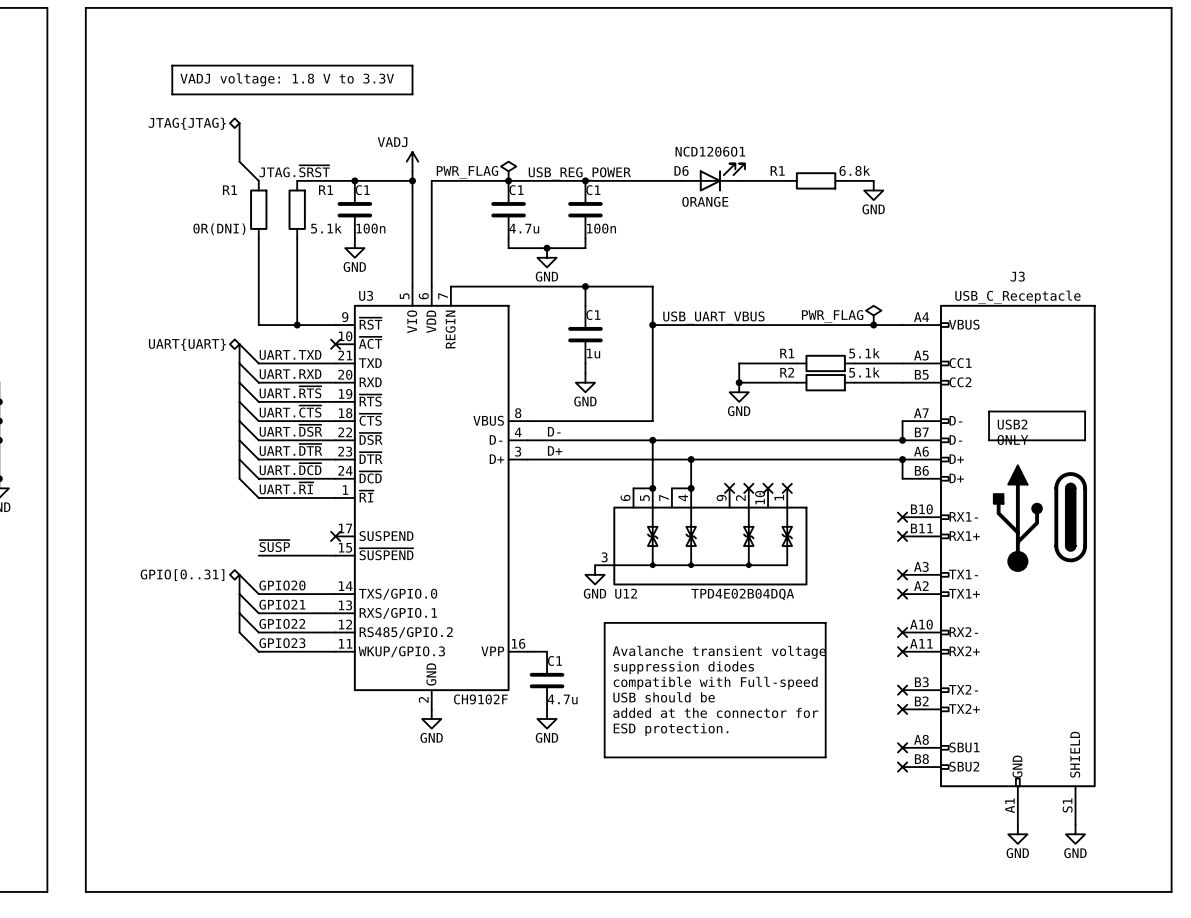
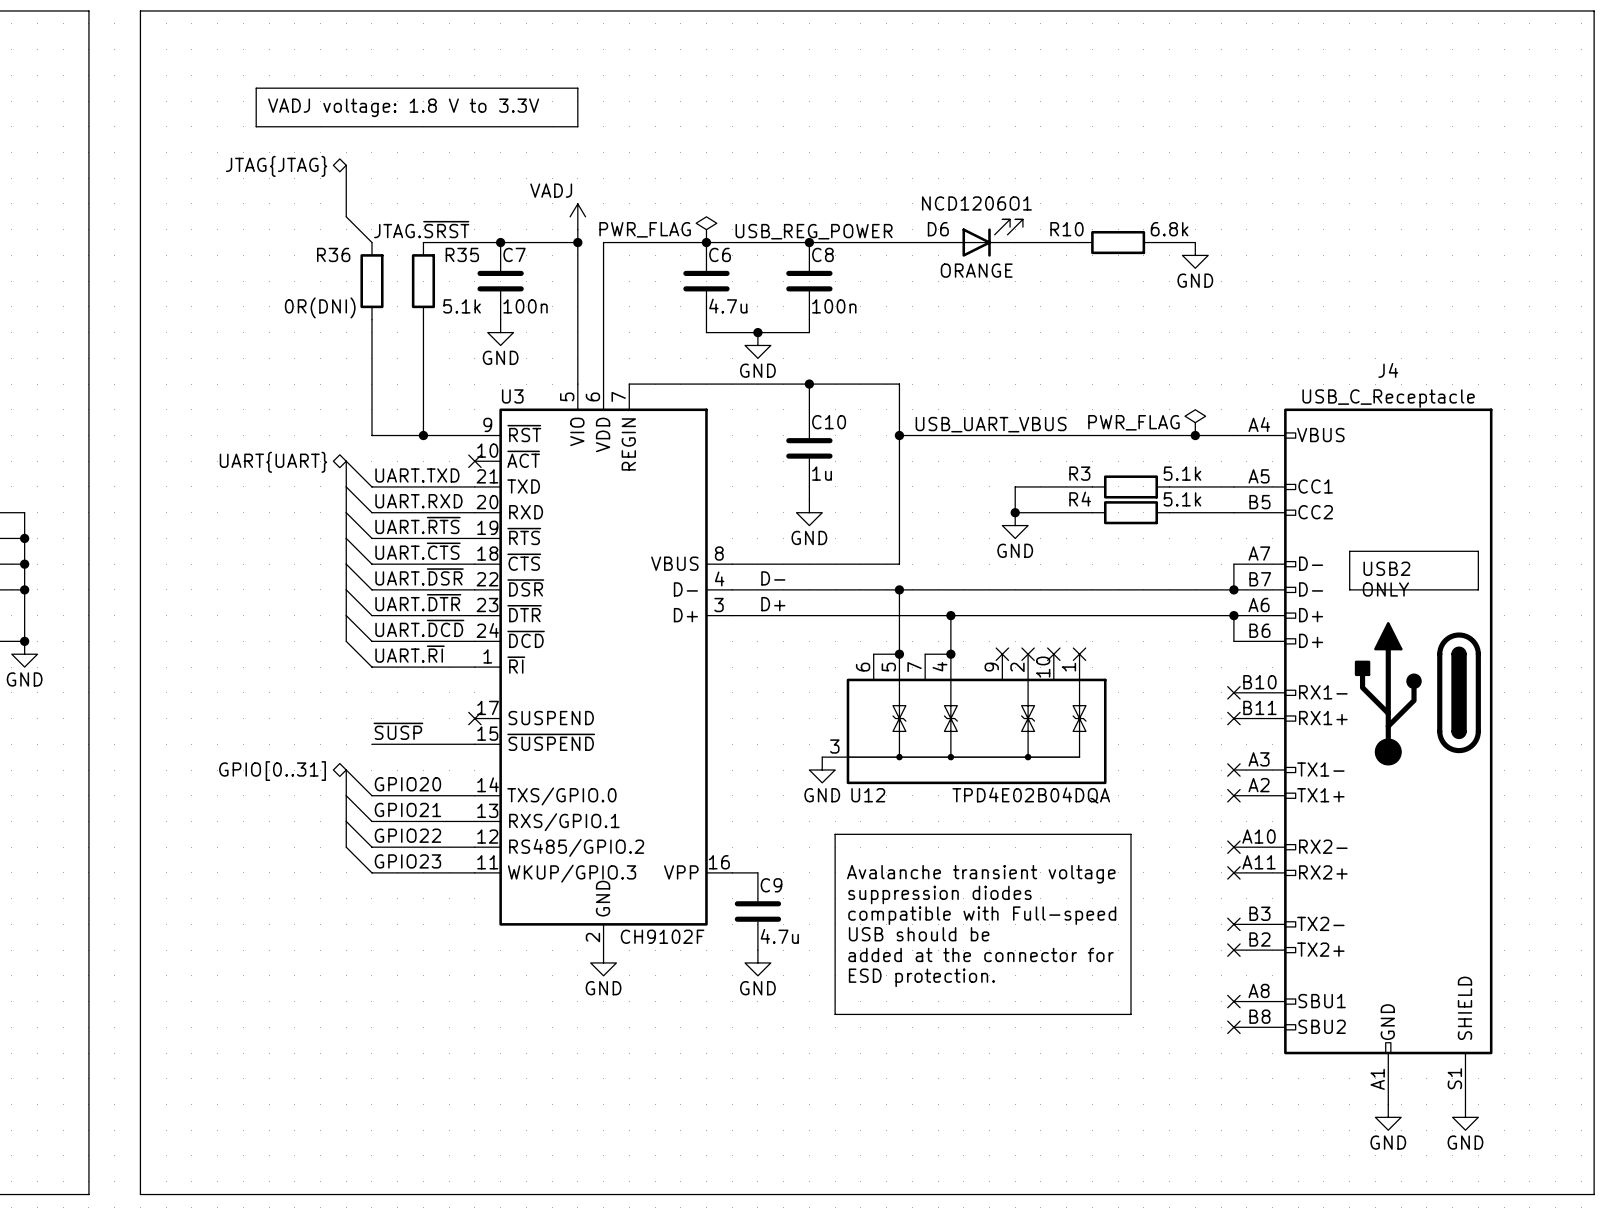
R1 name: R1 (777, 170) -> R10 (1066, 229)
R1 name: R1 (229, 190) -> R36 (333, 254)
R1 name: R1 (326, 190) -> R35 (462, 254)
C1 name: C1 (362, 190) -> C7 (514, 254)
C1 name: C1 (516, 190) -> C6 (720, 254)
C1 name: C1 (593, 190) -> C8 (822, 254)
J3 name: J3 (1017, 276) -> J4 (1388, 370)
C1 name: C1 (593, 315) -> C10 (829, 422)
R1 name: R1 (787, 353) -> R3 (1079, 473)
R2 name: R2 (787, 372) -> R4 (1080, 499)
C1 name: C1 (554, 660) -> C9 (771, 885)

